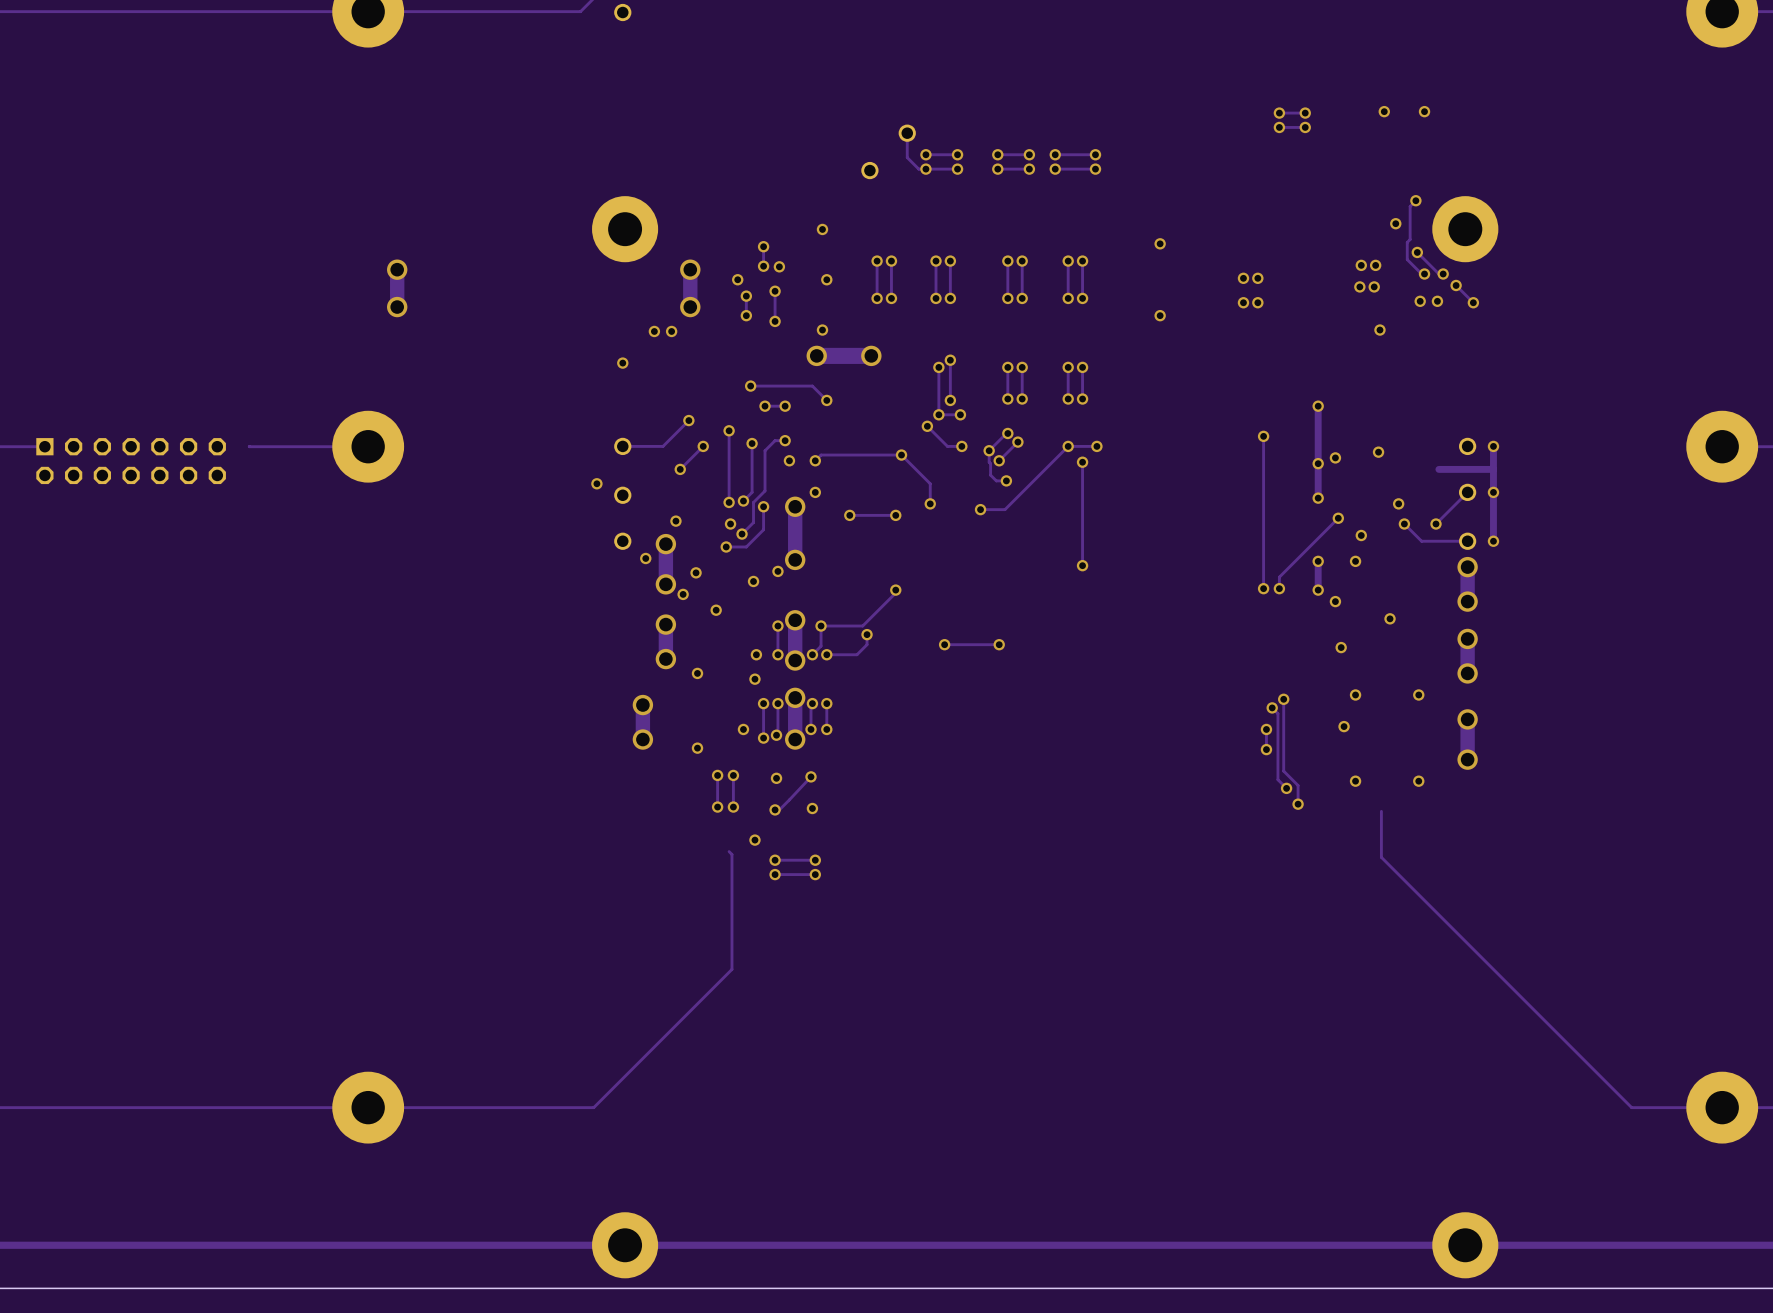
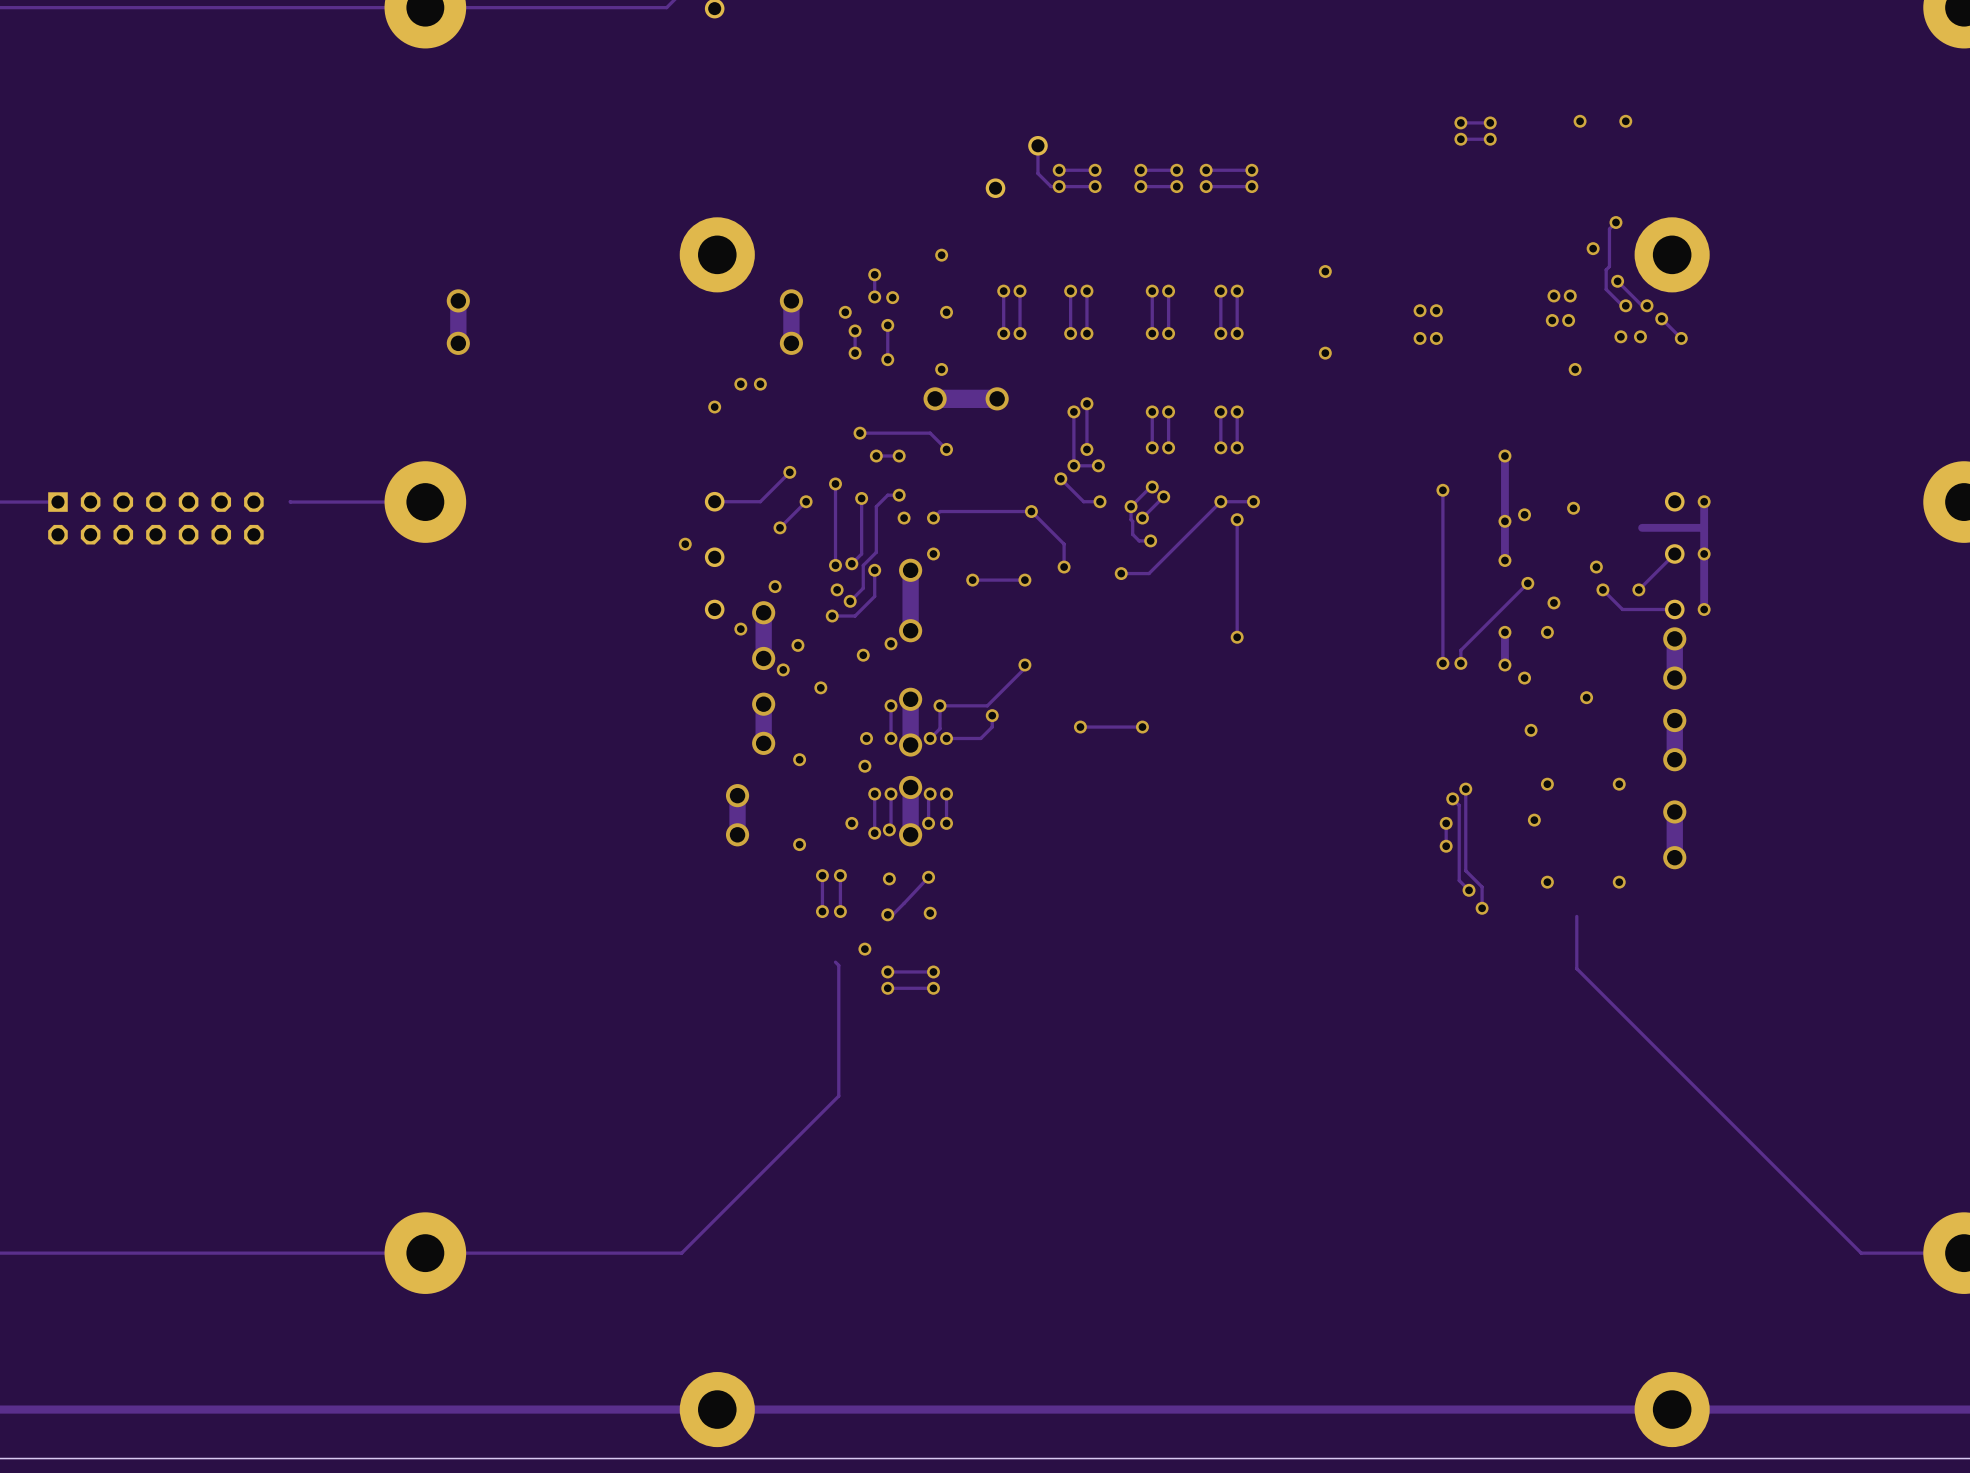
via: (654, 331) -> none
via: (671, 331) -> none
via: none -> (740, 384)
via: none -> (760, 384)

